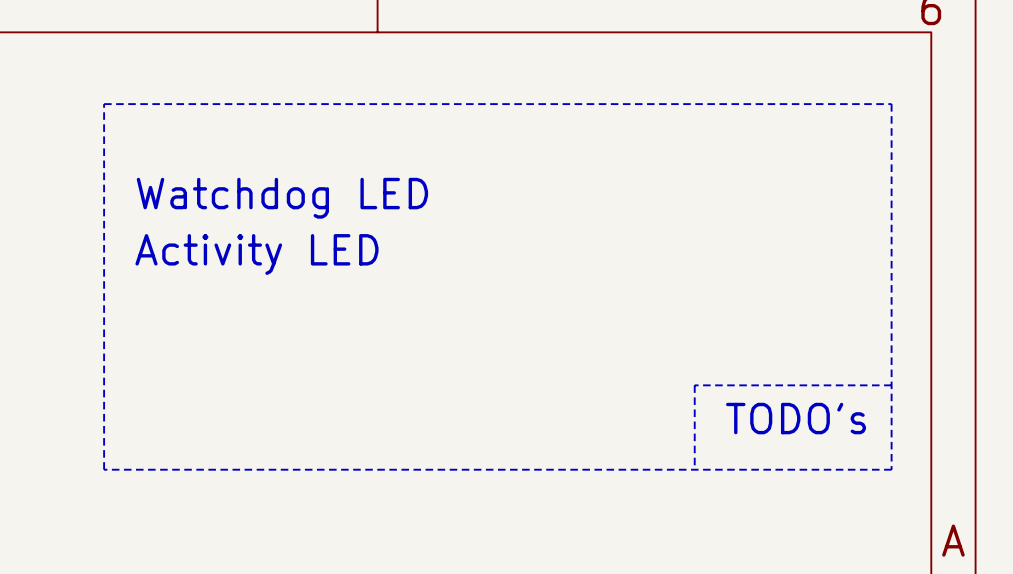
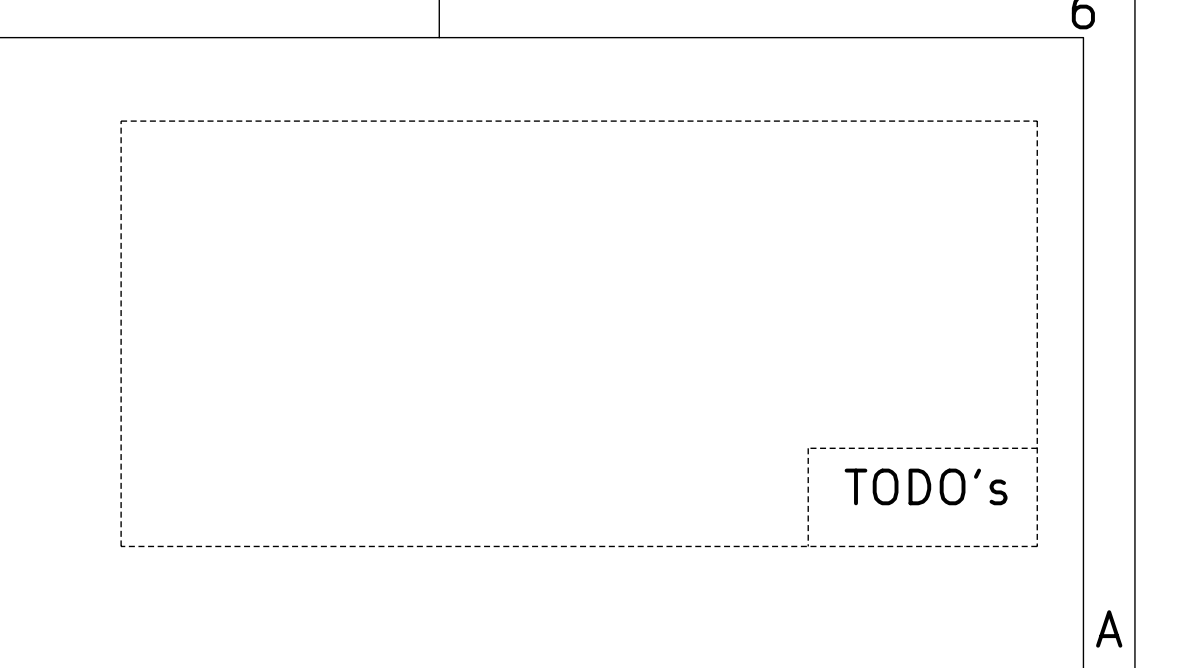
text: Watchdog LED (282, 198) -> none
text: Activity LED (256, 254) -> none

